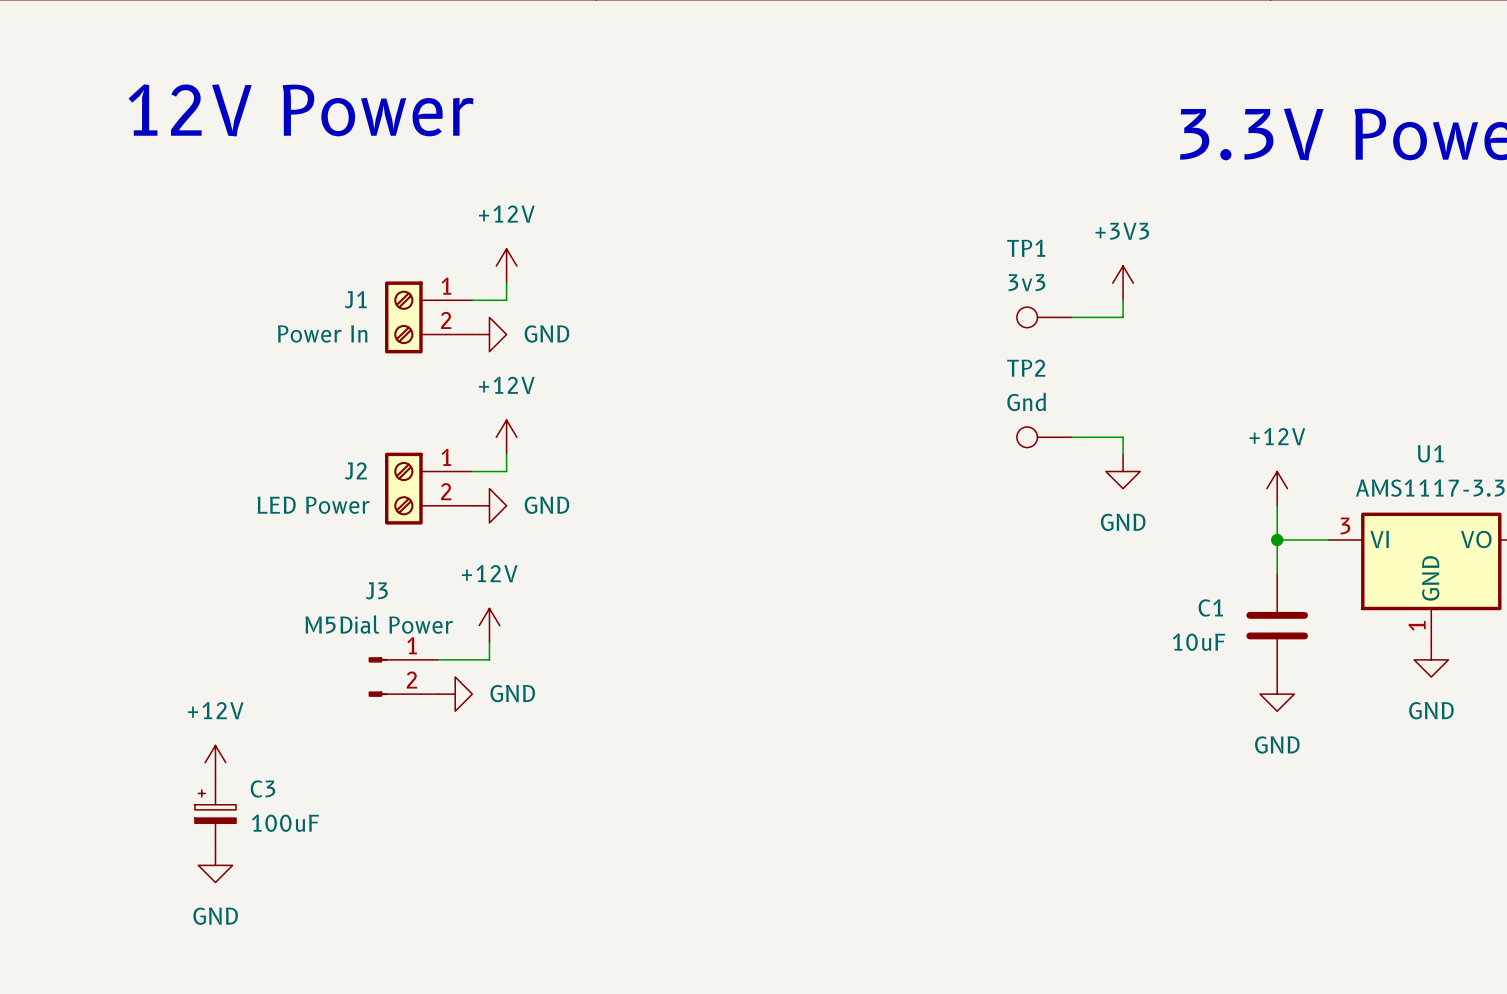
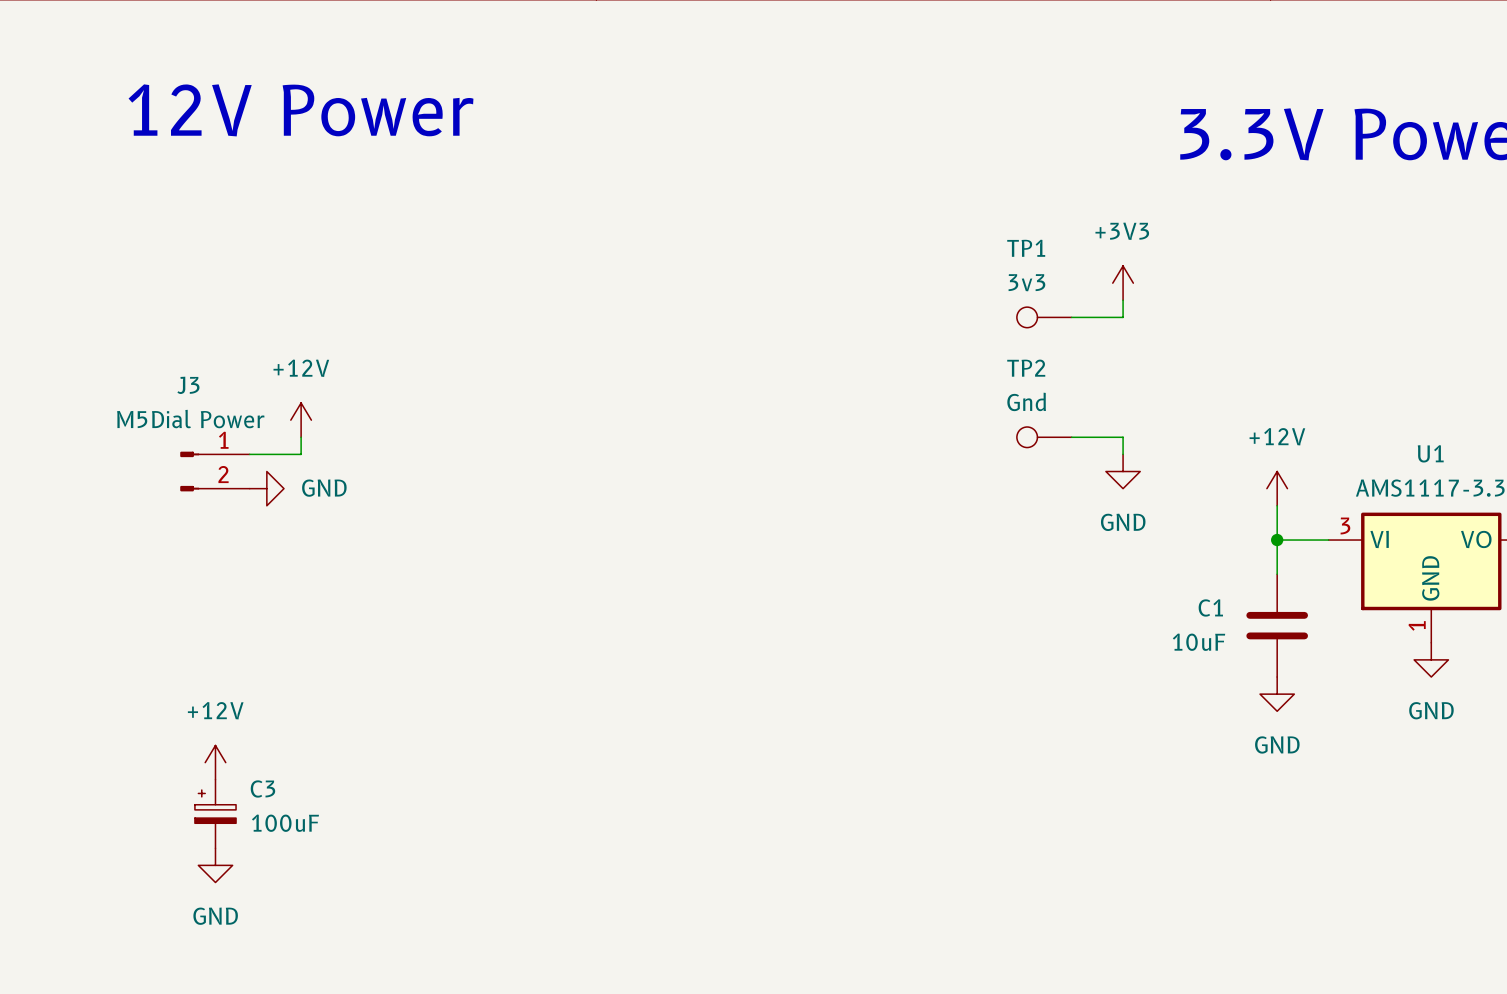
power symbol: +12V (506, 266) -> none
wire: (506, 283) (506, 300) (472, 300) -> none
J1: Power In (428, 317) -> none
power symbol: GND (489, 334) -> none
power symbol: none -> +12V (301, 420)
power symbol: +12V (506, 437) -> none
wire: (506, 454) (506, 471) (472, 471) -> none
power symbol: none -> GND (266, 488)
J2: LED Power (428, 488) -> none
power symbol: GND (489, 505) -> none
power symbol: +12V (489, 625) -> none
wire: (489, 642) (489, 659) (438, 659) -> (301, 437) (301, 454) (249, 454)
J3 position: (403, 677) -> (214, 471)
power symbol: GND (455, 694) -> none

